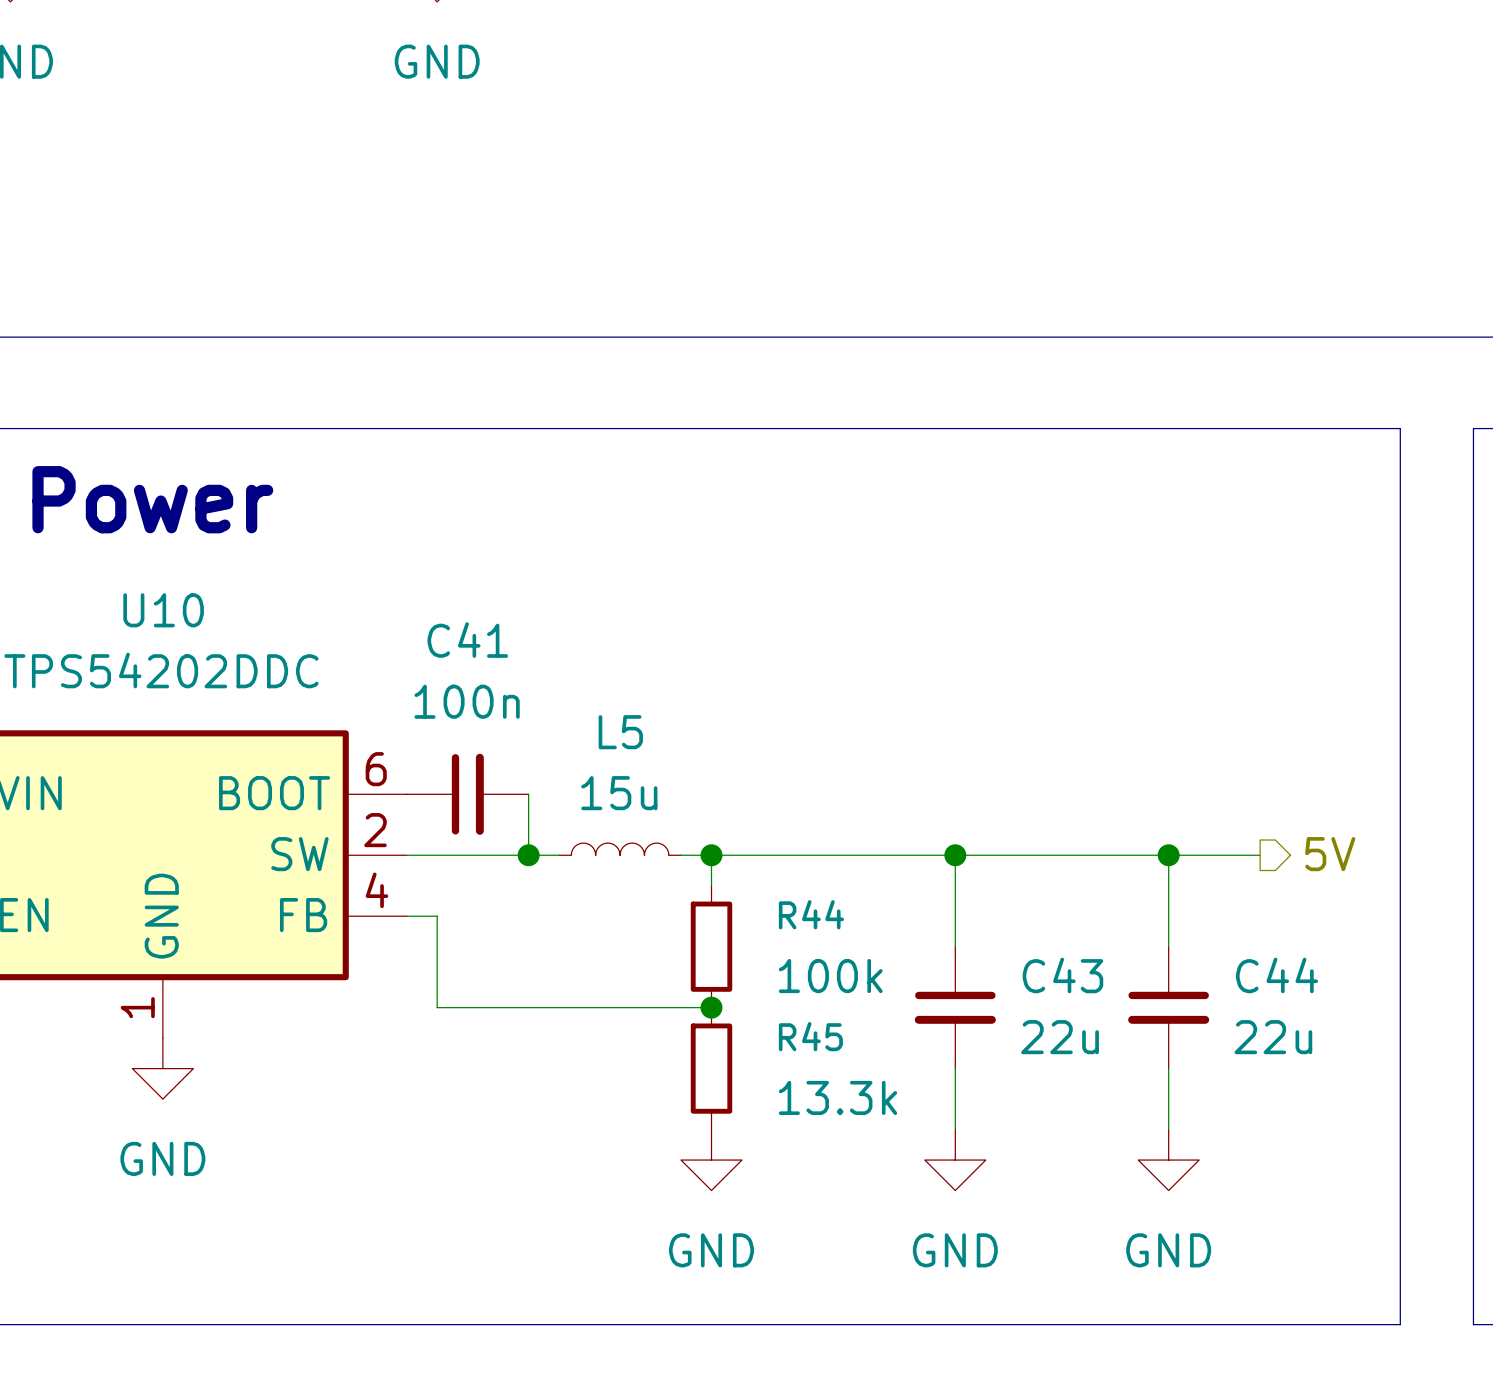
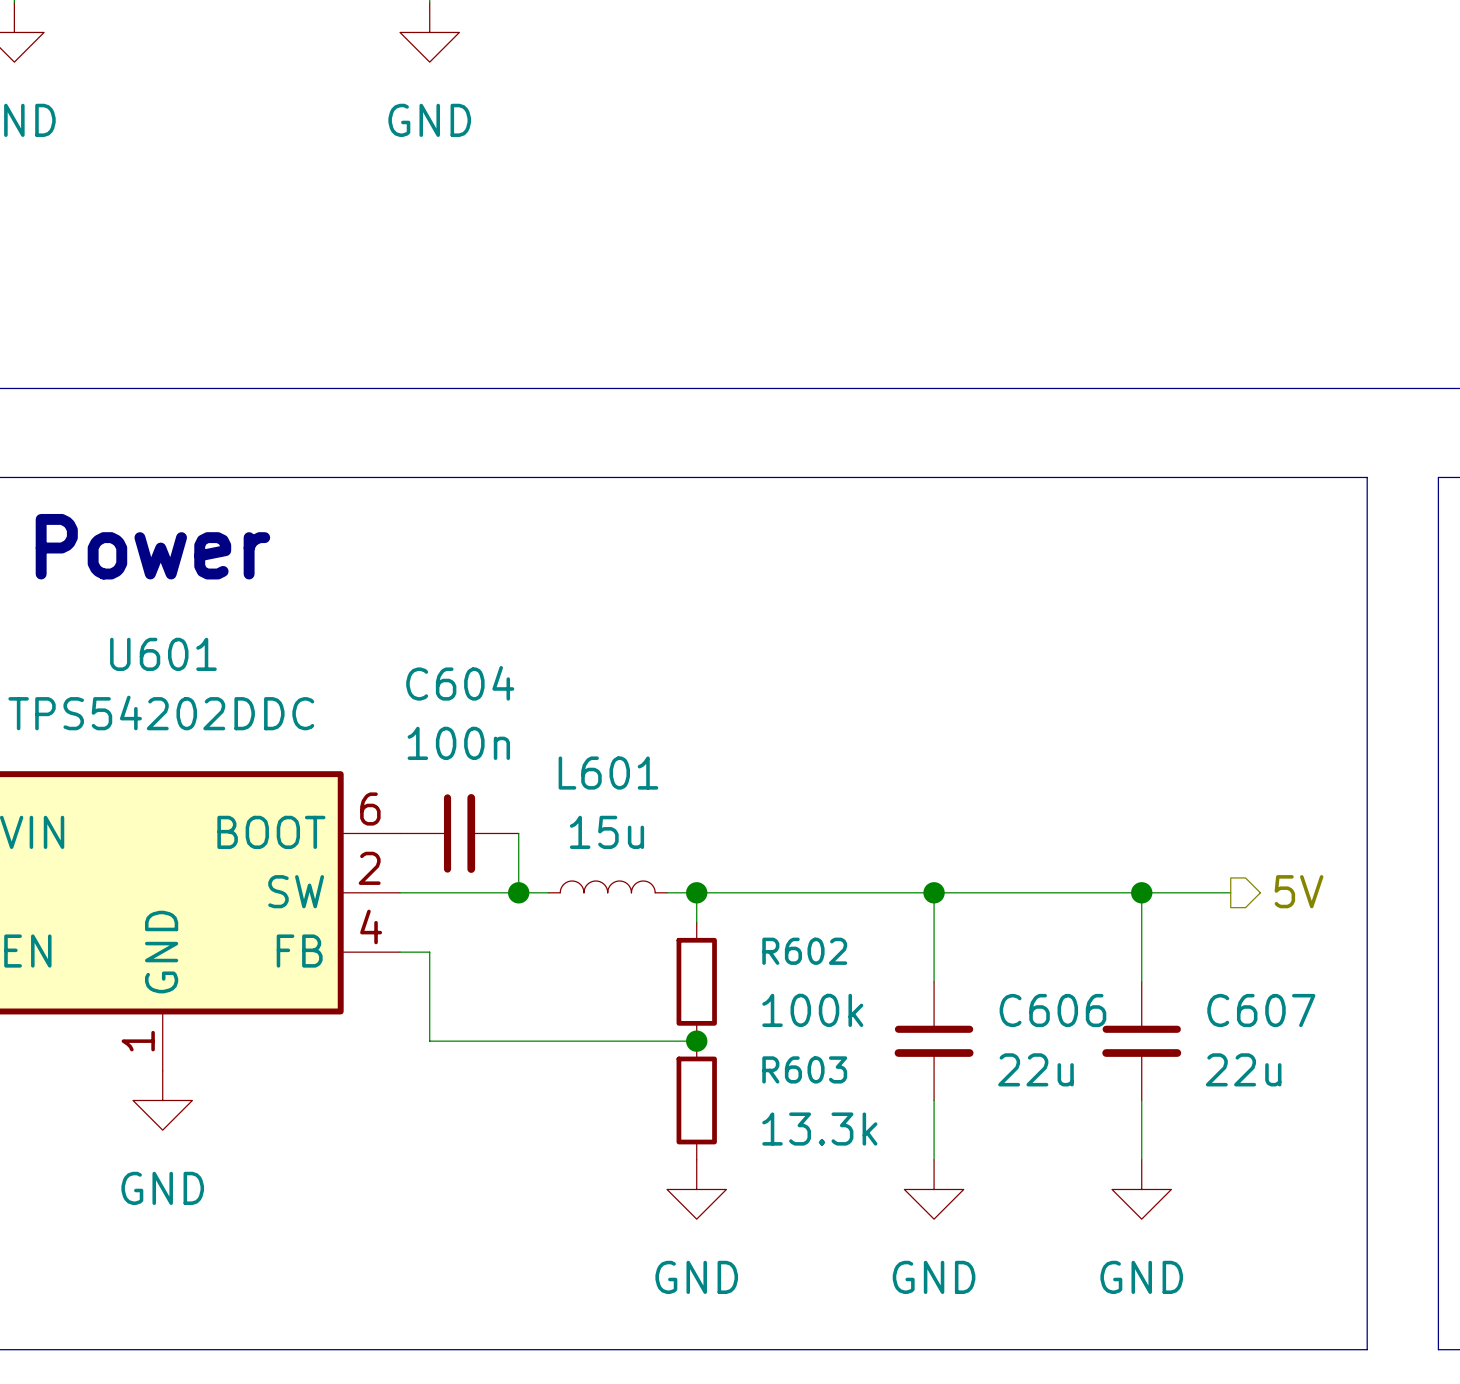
U10 name: U10 (163, 610) -> U601 (163, 654)
C41 name: C41 (467, 640) -> C604 (460, 683)
L5 name: L5 (620, 732) -> L601 (608, 773)
R44 name: R44 (811, 914) -> R602 (804, 951)
C43 name: C43 (1062, 975) -> C606 (1052, 1010)
C44 name: C44 (1277, 975) -> C607 (1261, 1010)
R45 name: R45 (810, 1036) -> R603 (804, 1069)

